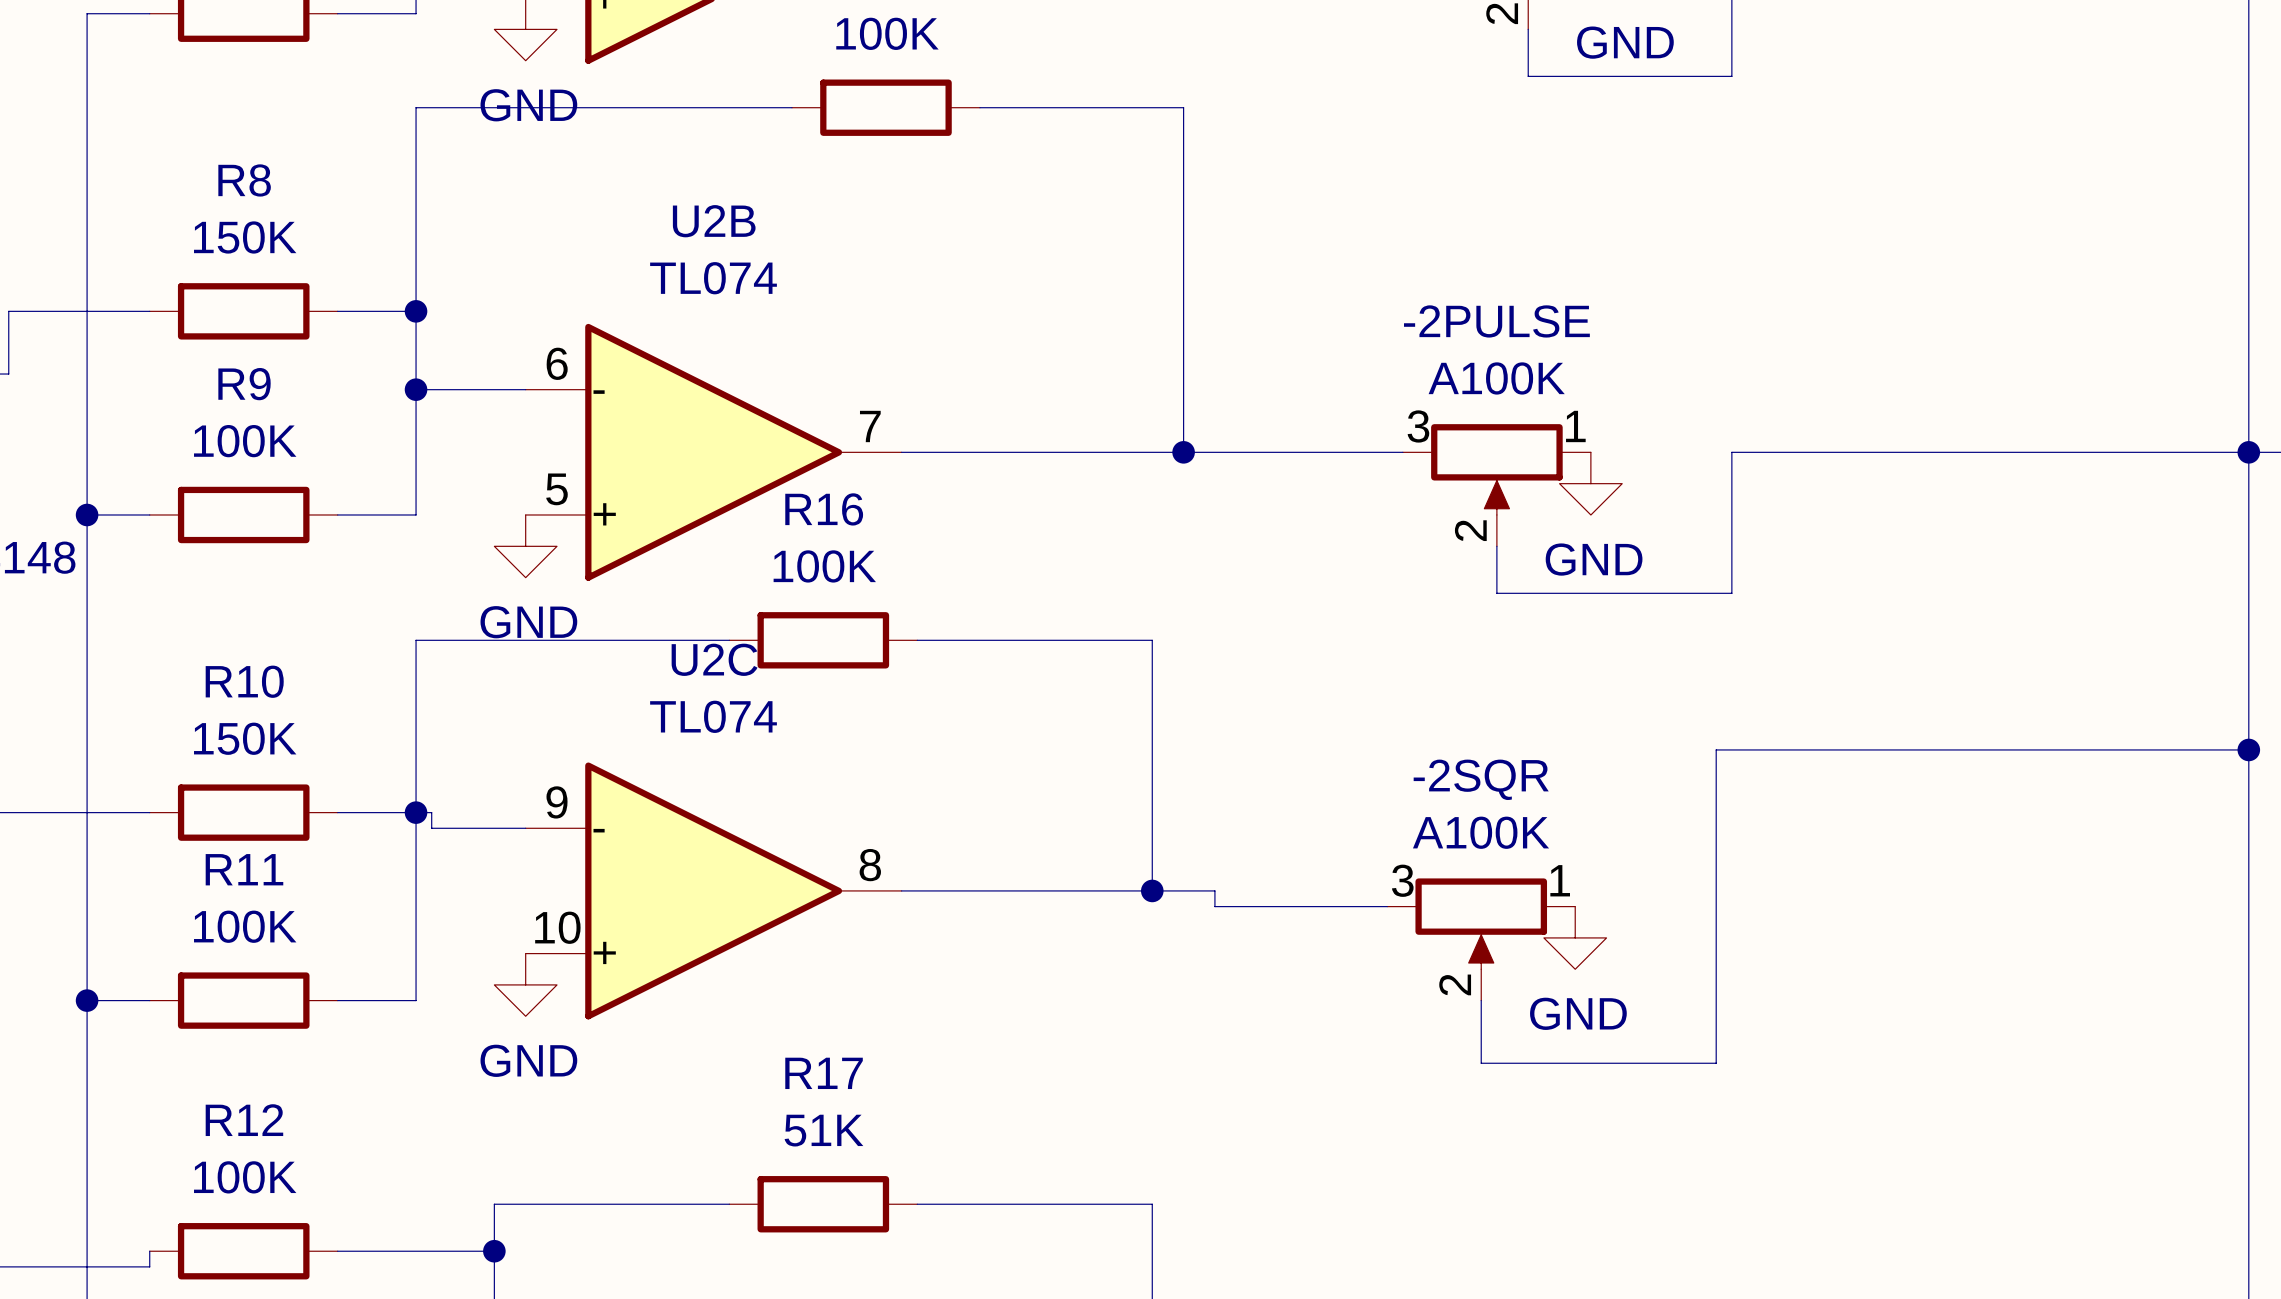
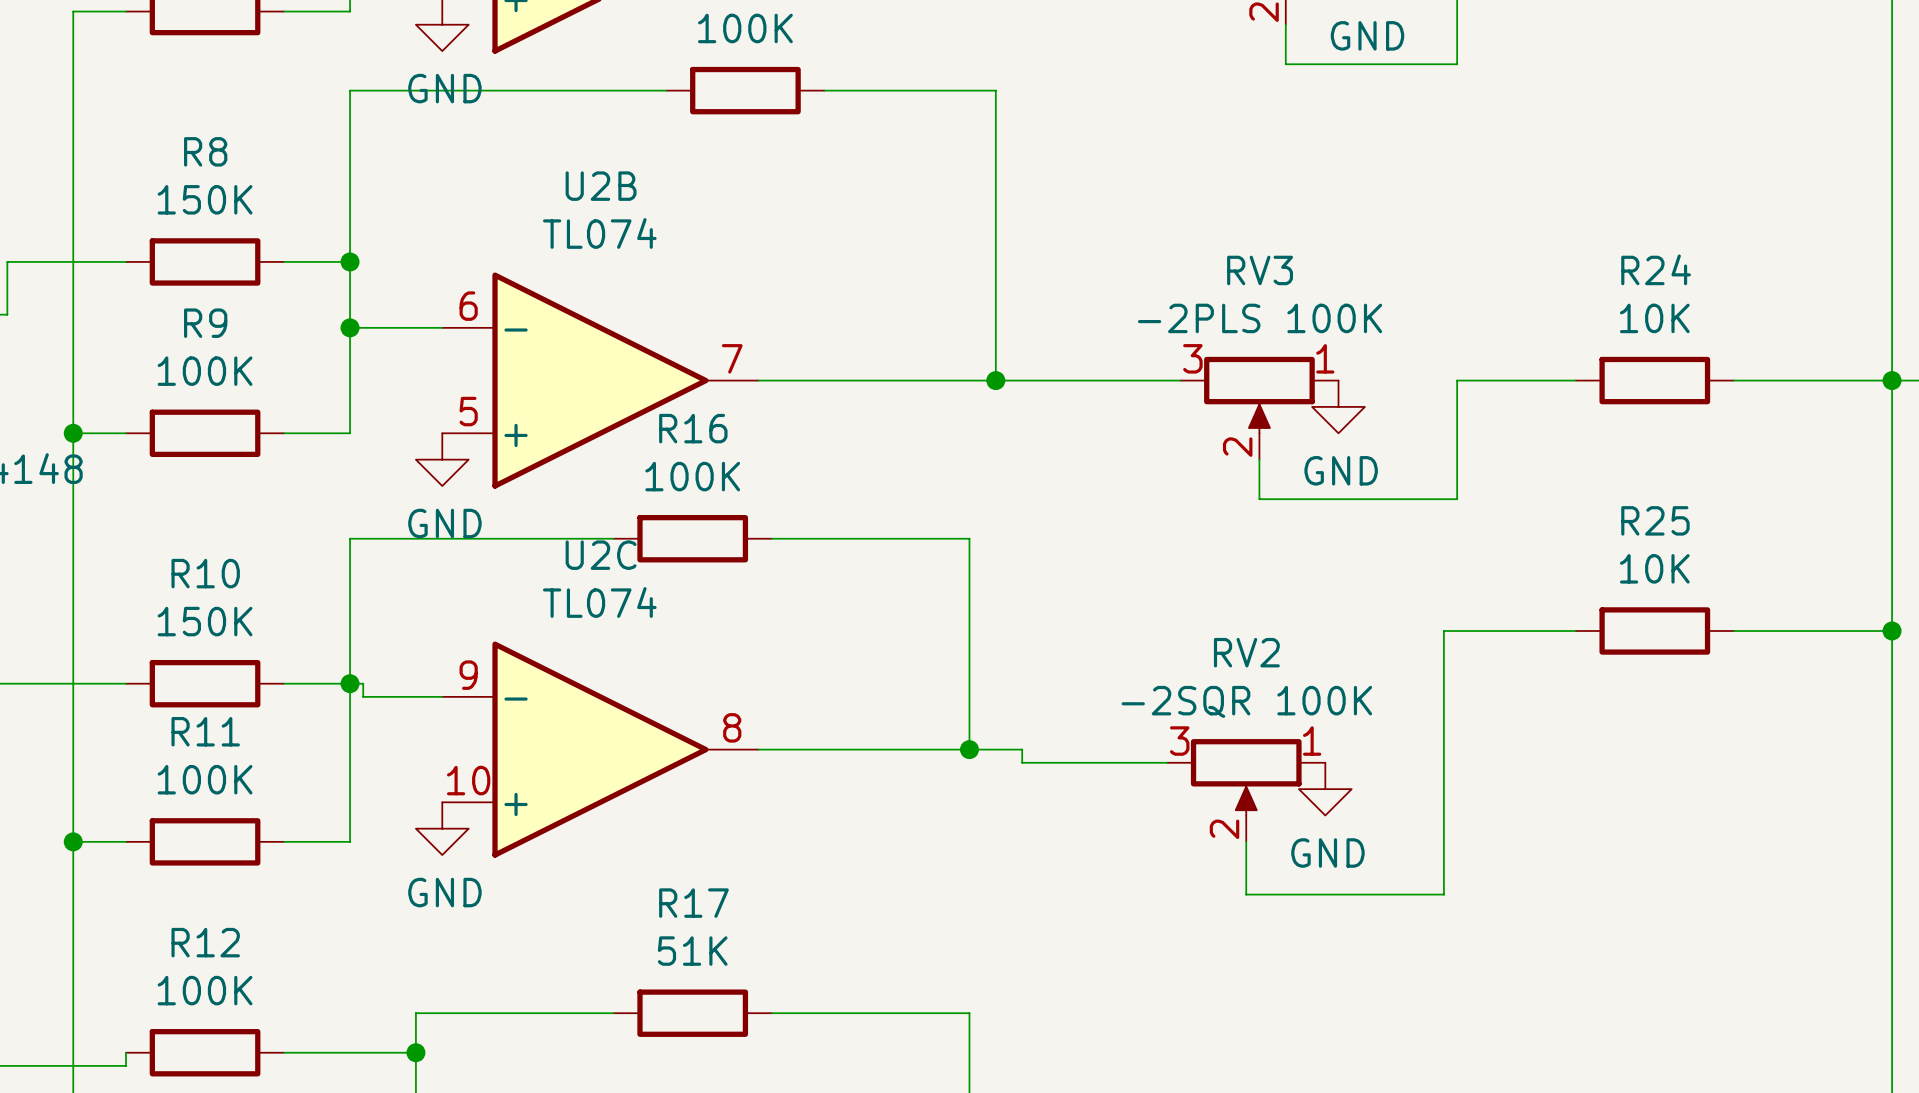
-2PULSE name: -2PULSE (1496, 321) -> RV3 (1260, 270)
-2PULSE value: A100K (1496, 378) -> -2PLS 100K (1260, 318)
wire: (1872, 452) (2060, 452) -> none
R24: none -> 10K (1654, 380)
wire: (1872, 749) (2060, 749) -> none
R25: none -> 10K (1654, 630)
-2SQR name: -2SQR (1481, 779) -> RV2 (1246, 652)
-2SQR value: A100K (1481, 832) -> -2SQR 100K (1246, 701)

